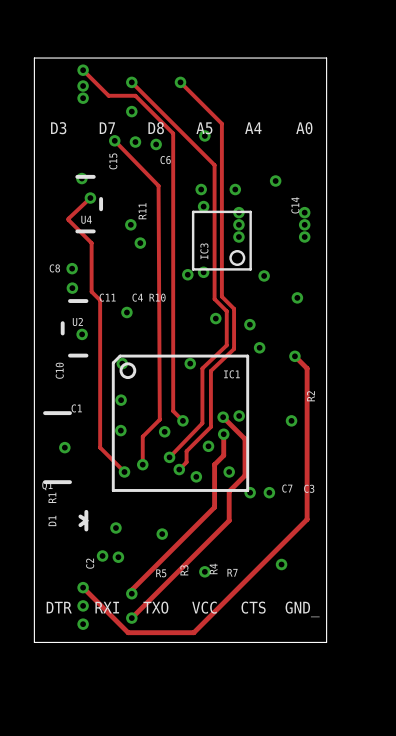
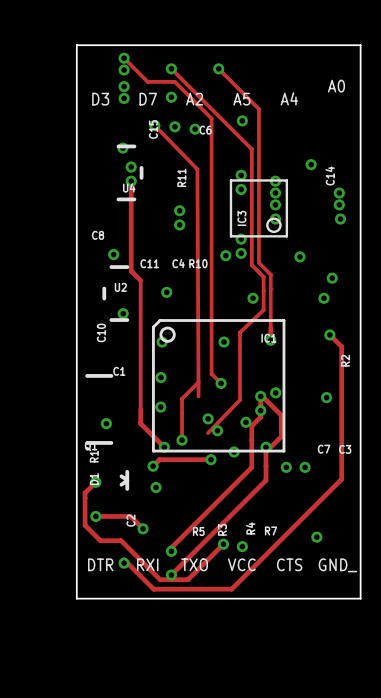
track: (83, 70) (108, 95) (135, 95) (173, 133) (173, 148) -> (124, 58) (147, 81) (174, 81) (211, 118)
via: (83, 70) -> none
board edge: (34, 72) (34, 58) (326, 58) (326, 72) -> (76, 45) (360, 45)
track: (131, 82) (214, 165) (214, 179) -> (171, 68) (251, 149)
via: (131, 82) -> none
track: (180, 82) (221, 123) (221, 138) -> (218, 68) (258, 109)
via position: (180, 82) -> (218, 68)
via: none -> (171, 68)
via: (131, 111) -> none
via: none -> (124, 86)
via: none -> (171, 97)
via: none -> (124, 98)
D8 name: D8 (156, 128) -> A2 (194, 99)
A0 position: (304, 128) -> (336, 86)
via position: (204, 135) -> (242, 120)
track: (114, 140) (158, 185) (158, 200) -> (154, 125) (197, 169)
via: (114, 140) -> none
via: (135, 142) -> none
via: (156, 144) -> none
via: none -> (154, 125)
via: none -> (174, 126)
via: none -> (195, 129)
via position: (275, 180) -> (311, 164)
via: (201, 189) -> none
via: (235, 189) -> none
track: (90, 198) (68, 219) (91, 243) (91, 291) (100, 300) (100, 314) -> (131, 181) (131, 271) (140, 280)
via: none -> (131, 181)
via: (304, 212) -> none
via: none -> (241, 189)
via: (130, 224) -> none
via: none -> (275, 219)
via: none -> (340, 219)
via: none -> (179, 224)
via: (72, 268) -> none
via: (187, 274) -> none
via position: (264, 275) -> (299, 256)
via: none -> (241, 253)
via: none -> (225, 255)
via position: (297, 297) -> (332, 278)
via position: (126, 312) -> (166, 292)
via position: (215, 318) -> (253, 298)
via: (249, 324) -> none
via: none -> (323, 298)
via position: (82, 334) -> (123, 313)
via: (259, 347) -> none
track: (234, 349) (210, 370) (210, 426) (186, 451) (186, 462) (179, 469) -> (270, 313) (270, 340)
track: (294, 356) (307, 368) (307, 383) -> (329, 334) (341, 346)
via: (294, 356) -> none
via: (122, 363) -> none
via position: (190, 363) -> (224, 342)
via: none -> (329, 334)
via: none -> (270, 340)
via: none -> (162, 342)
via: (121, 400) -> none
via: none -> (160, 377)
via: (239, 415) -> none
track: (223, 417) (245, 439) (245, 453) -> (260, 394) (281, 415)
via: (223, 417) -> none
via position: (291, 420) -> (326, 397)
track: (202, 423) (169, 457) -> (239, 385) (239, 399) (208, 433)
via: (120, 430) -> none
via: none -> (275, 392)
via: (164, 431) -> none
via: none -> (160, 407)
via: (208, 446) -> none
via position: (64, 447) -> (106, 423)
track: (100, 447) (124, 471) -> (140, 409) (140, 423) (164, 447)
via: none -> (260, 410)
via: none -> (245, 422)
track: none -> (182, 425) (182, 440)
via: (142, 464) -> none
via: (124, 471) -> none
via: (229, 471) -> none
via: (196, 476) -> none
via: none -> (182, 440)
via: none -> (164, 447)
via: none -> (266, 447)
via: none -> (234, 452)
via: (250, 492) -> none
via: (269, 492) -> none
track: none -> (211, 459) (159, 459) (153, 466)
via: none -> (211, 459)
via: none -> (153, 466)
via: none -> (286, 467)
via: none -> (305, 467)
track: none -> (95, 482) (85, 493) (85, 525) (100, 540) (121, 540) (160, 579) (187, 579) (223, 544)
via: none -> (95, 482)
via: (162, 534) -> none
via: (102, 555) -> none
track: none -> (95, 516) (130, 516) (143, 528)
via: none -> (95, 516)
via: (118, 557) -> none
via position: (281, 564) -> (316, 537)
via: none -> (143, 528)
via: (204, 571) -> none
via: none -> (223, 544)
track: (83, 587) (128, 632) -> (124, 559) (153, 589) (167, 589)
via: (83, 587) -> none
via: none -> (242, 546)
via: (83, 624) -> none

